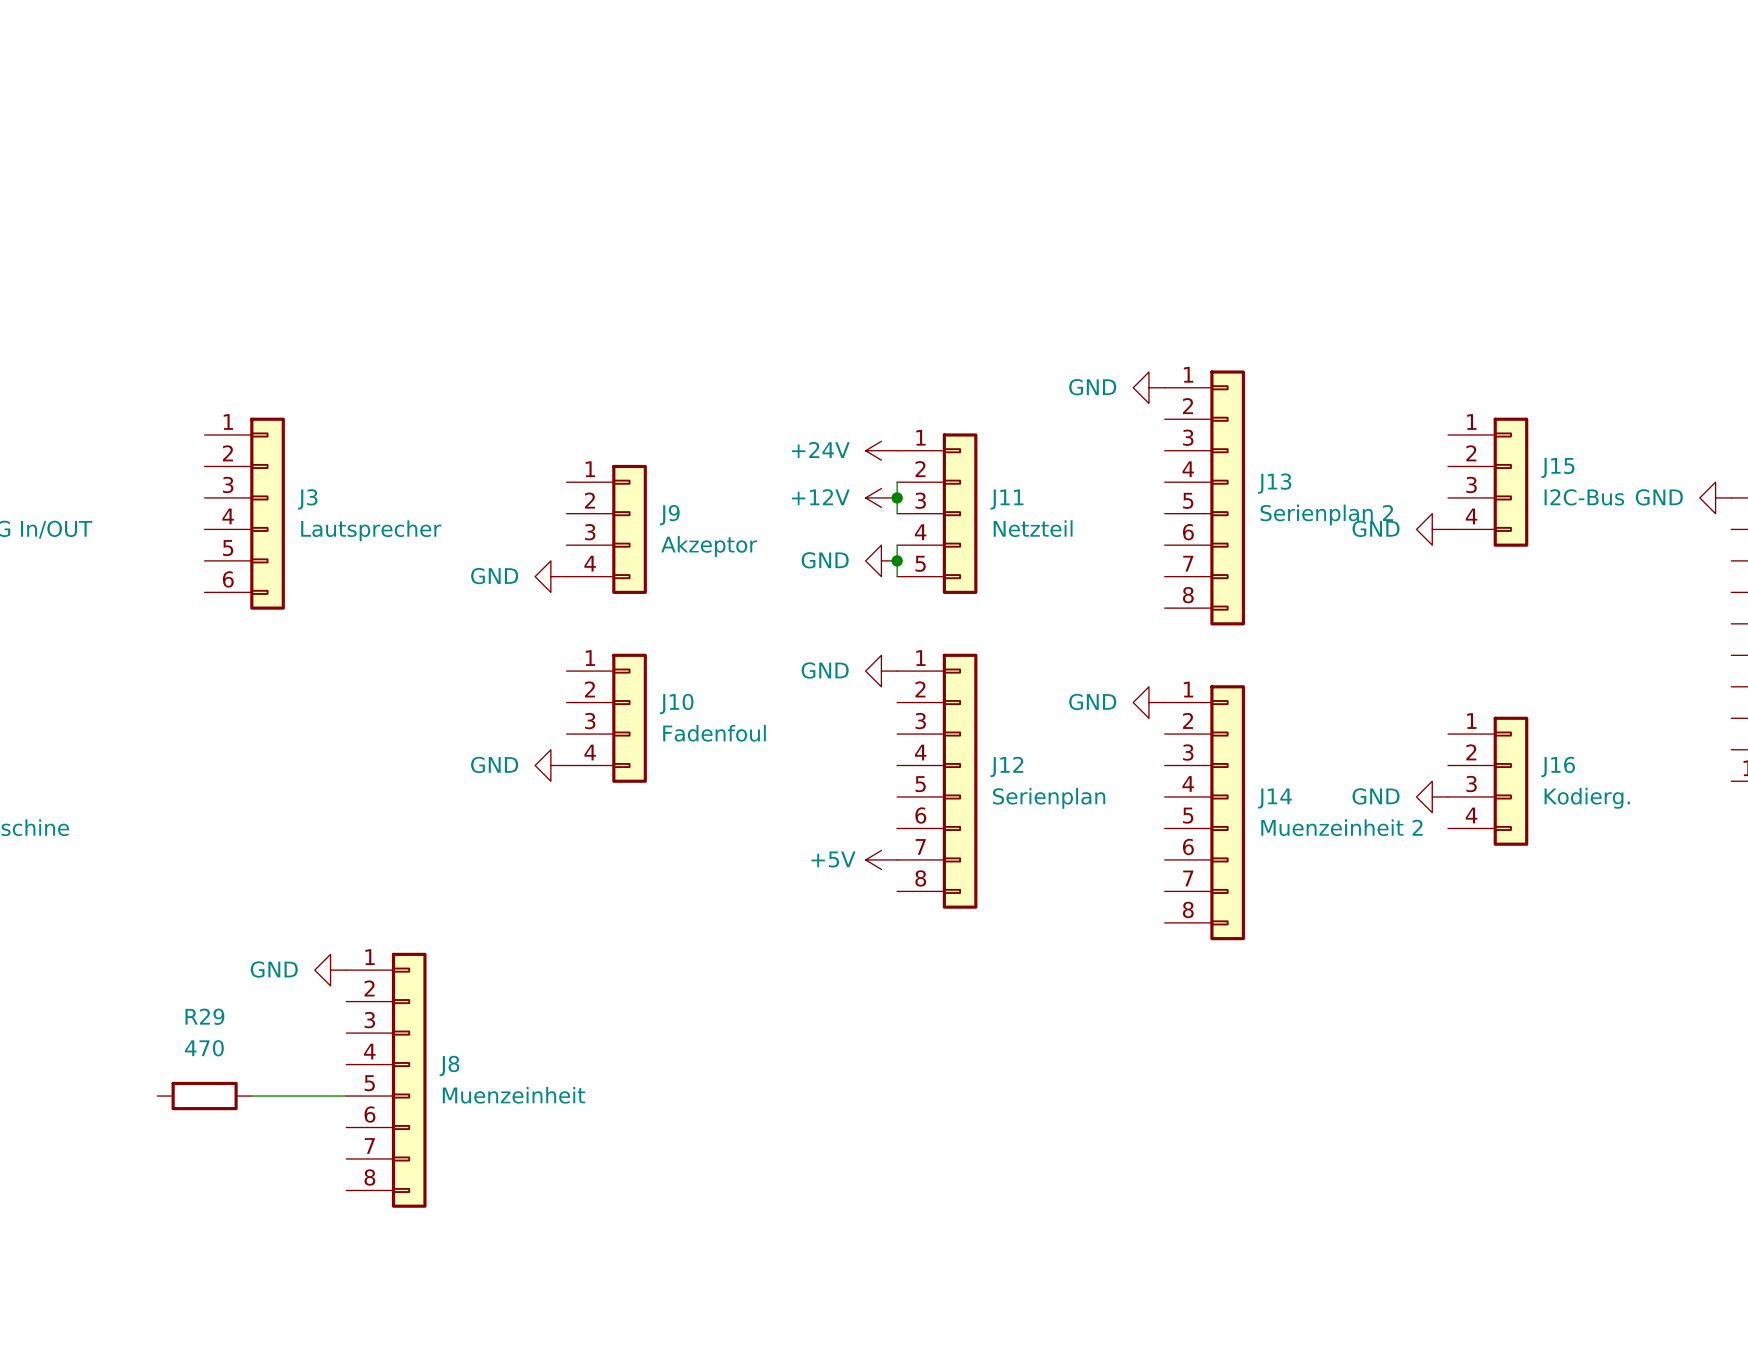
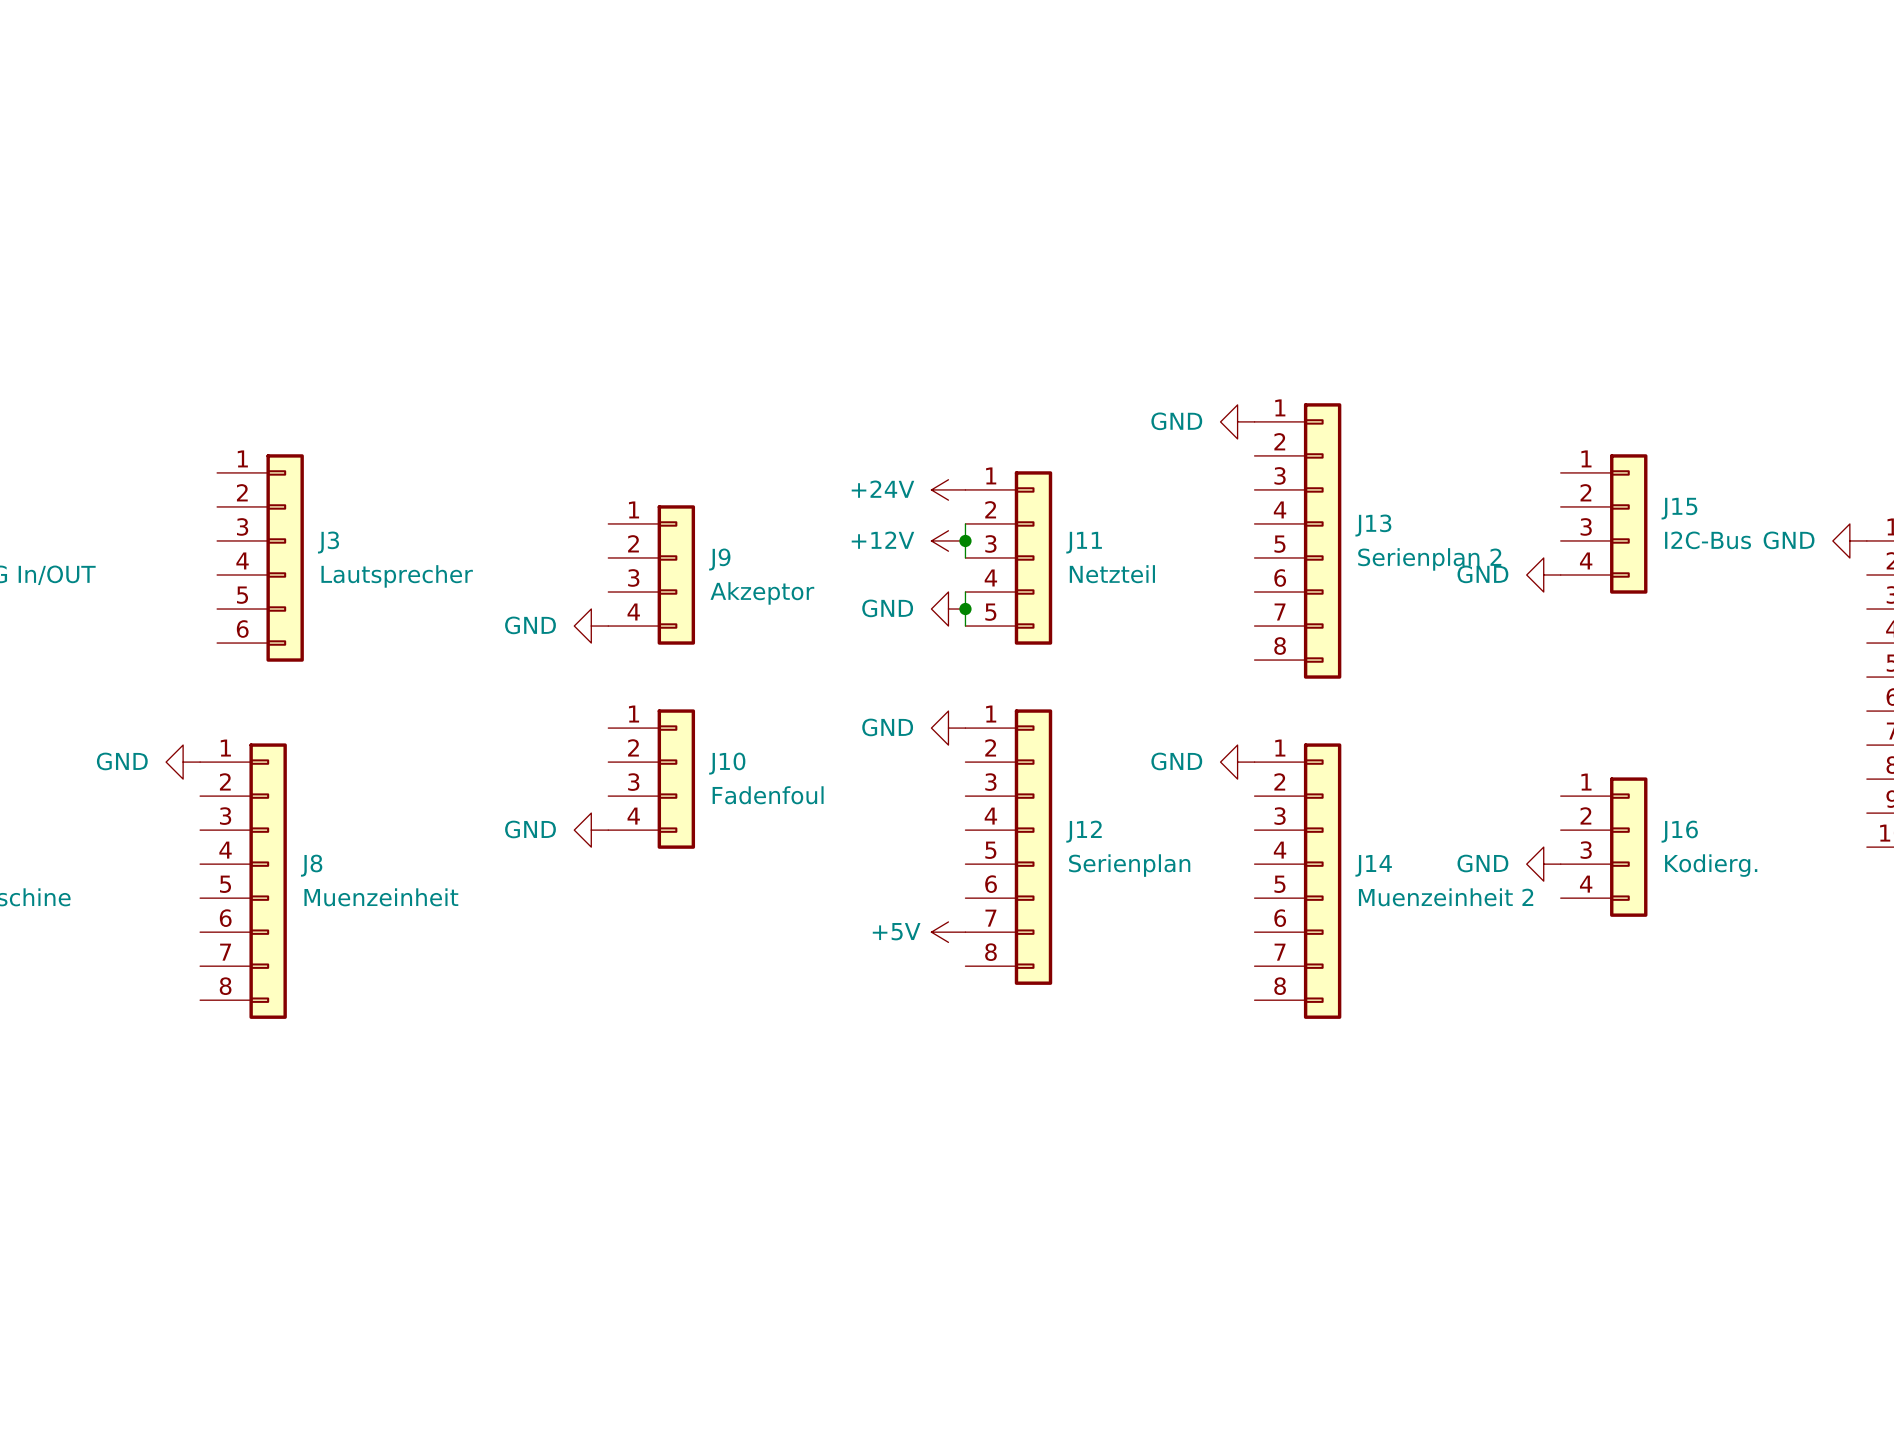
power symbol: none -> GND (183, 762)
power symbol: GND (330, 970) -> none
J8 position: (386, 1080) -> (243, 881)
R29: 470 (204, 1096) -> none
wire: (251, 1096) (346, 1096) -> none

